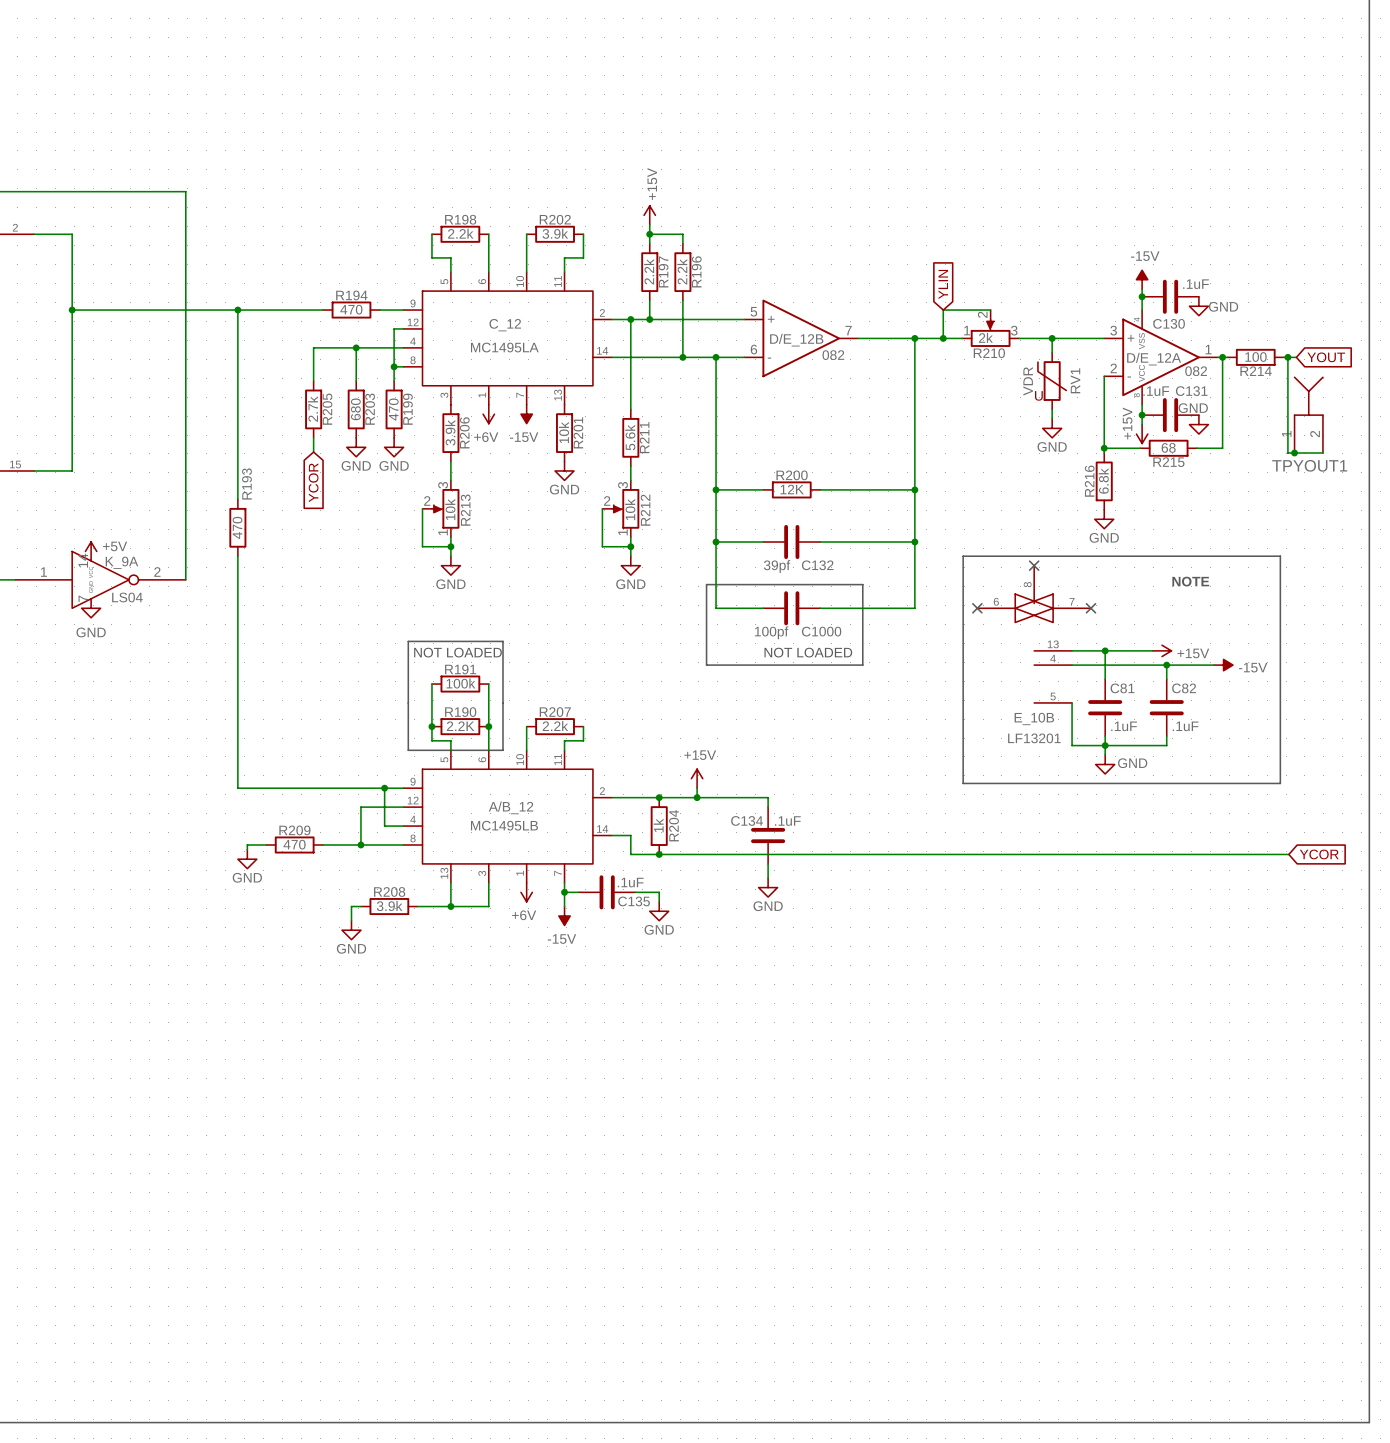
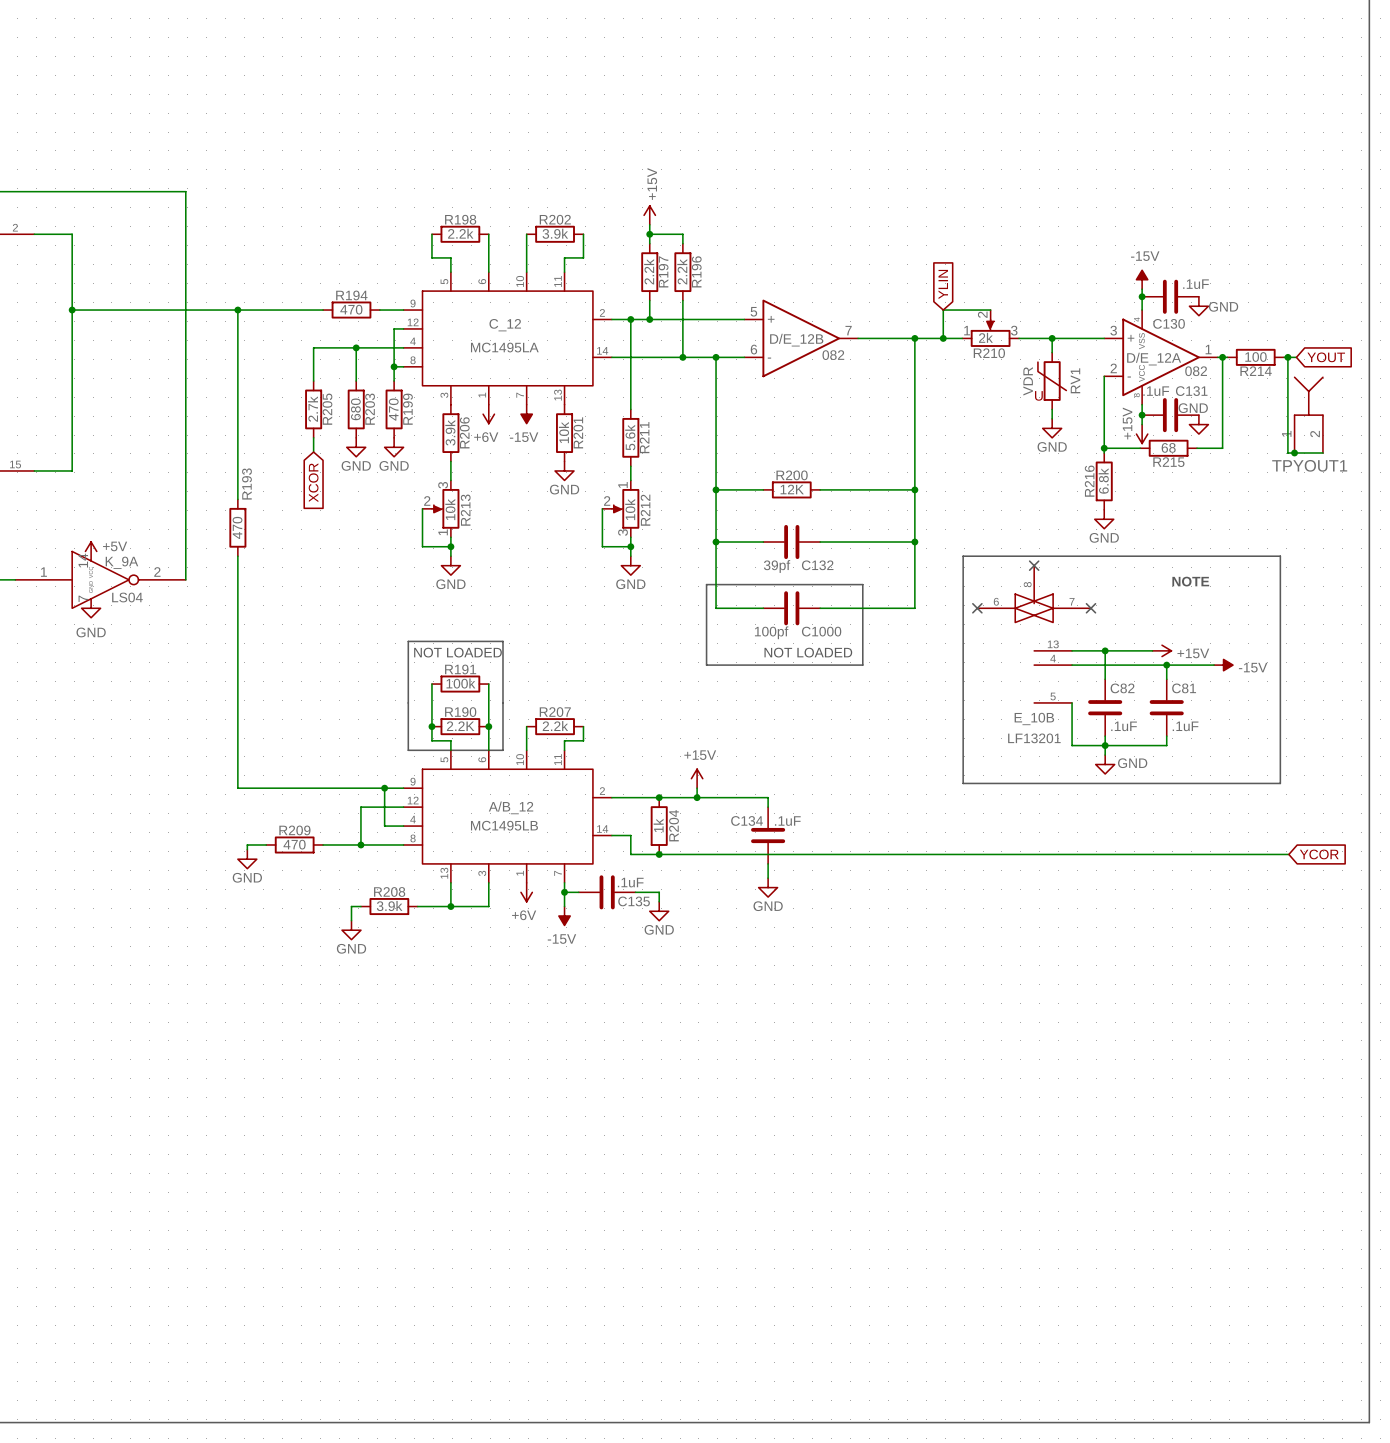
global label: YCOR (313, 482) -> XCOR (313, 482)
R212 pin number: 3 (623, 485) -> 1 (623, 485)
R212 pin number: 1 (623, 532) -> 3 (623, 532)
C81 name: C81 (1122, 688) -> C82 (1122, 688)
C82 name: C82 (1184, 688) -> C81 (1184, 688)

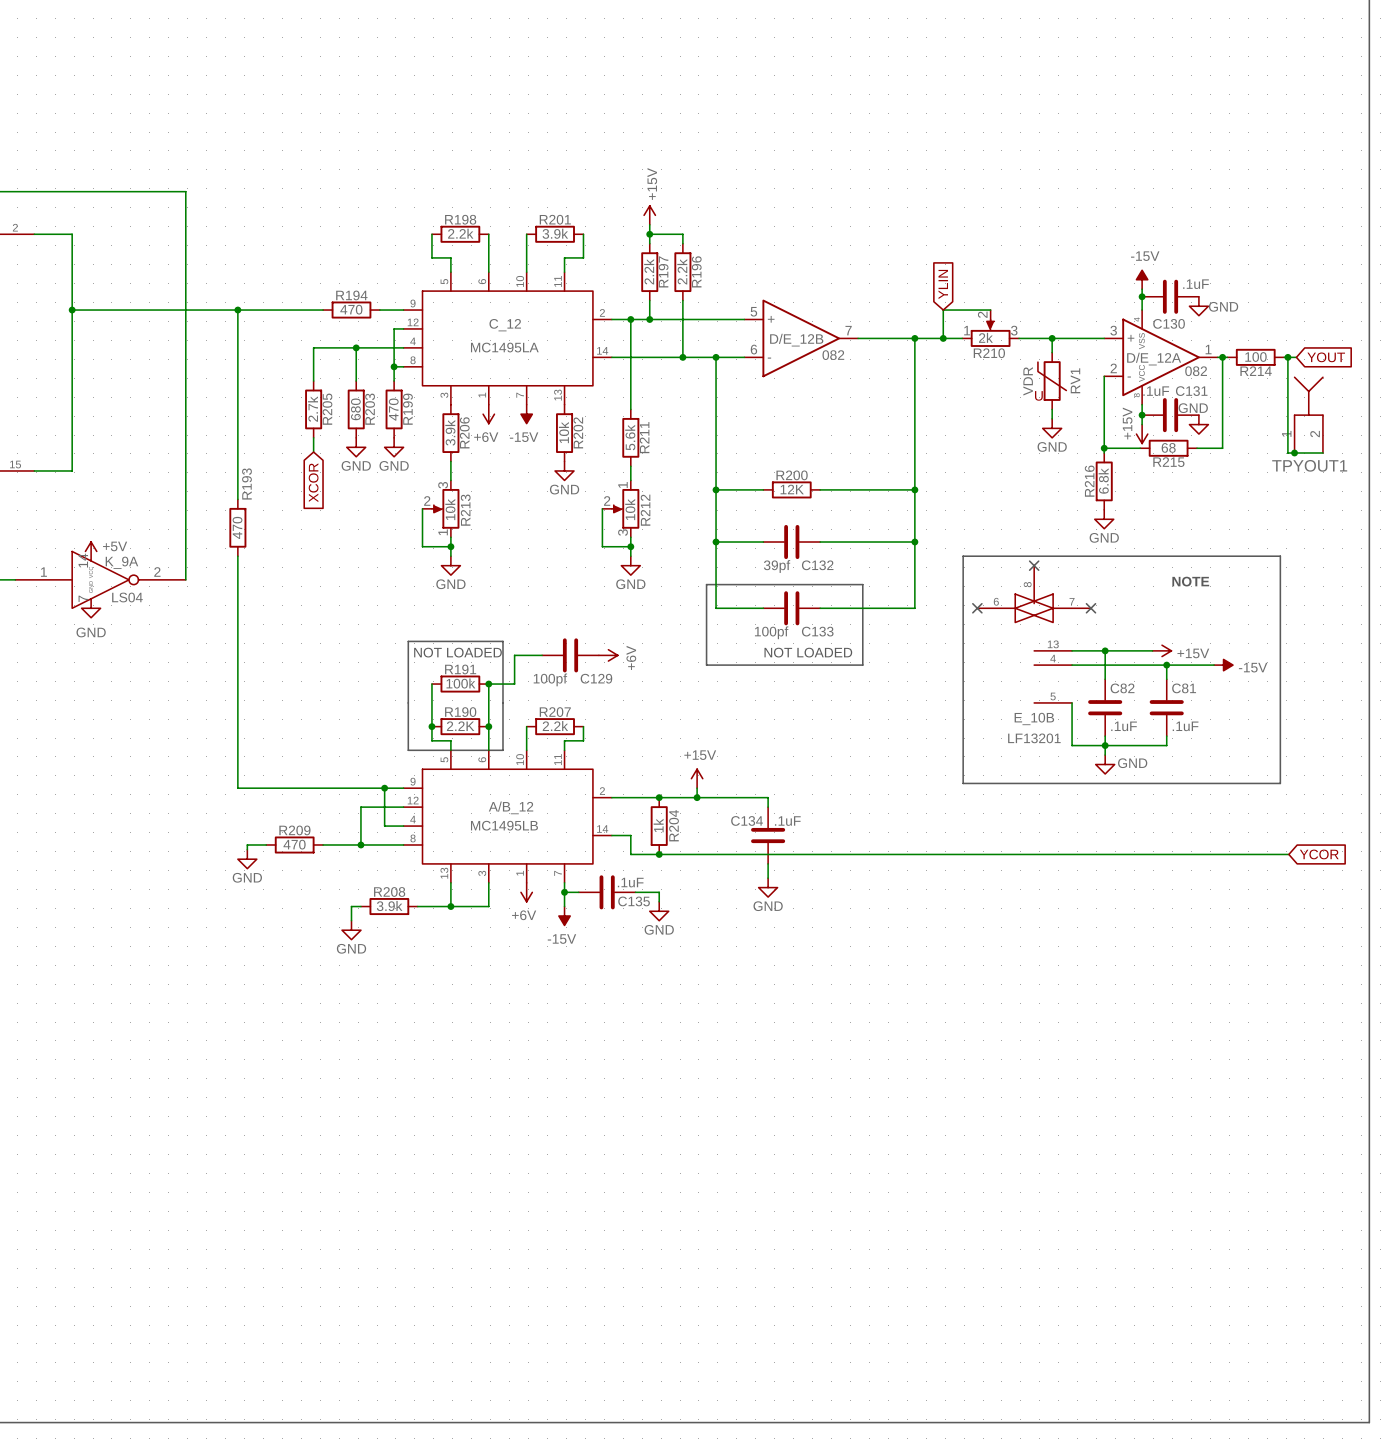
R202 name: R202 (555, 219) -> R201 (555, 219)
R201 name: R201 (578, 432) -> R202 (578, 432)
C1000 name: C1000 (821, 631) -> C133 (817, 631)
wire: none -> (542, 655) (514, 655) (514, 684) (488, 684)
C129: none -> 100pf (570, 655)
power symbol: none -> +6V (608, 655)
junction: none -> (488, 684)

